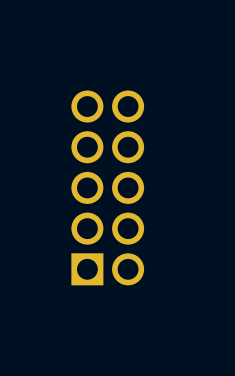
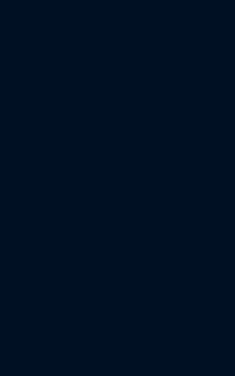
part: (107, 187) -> none

